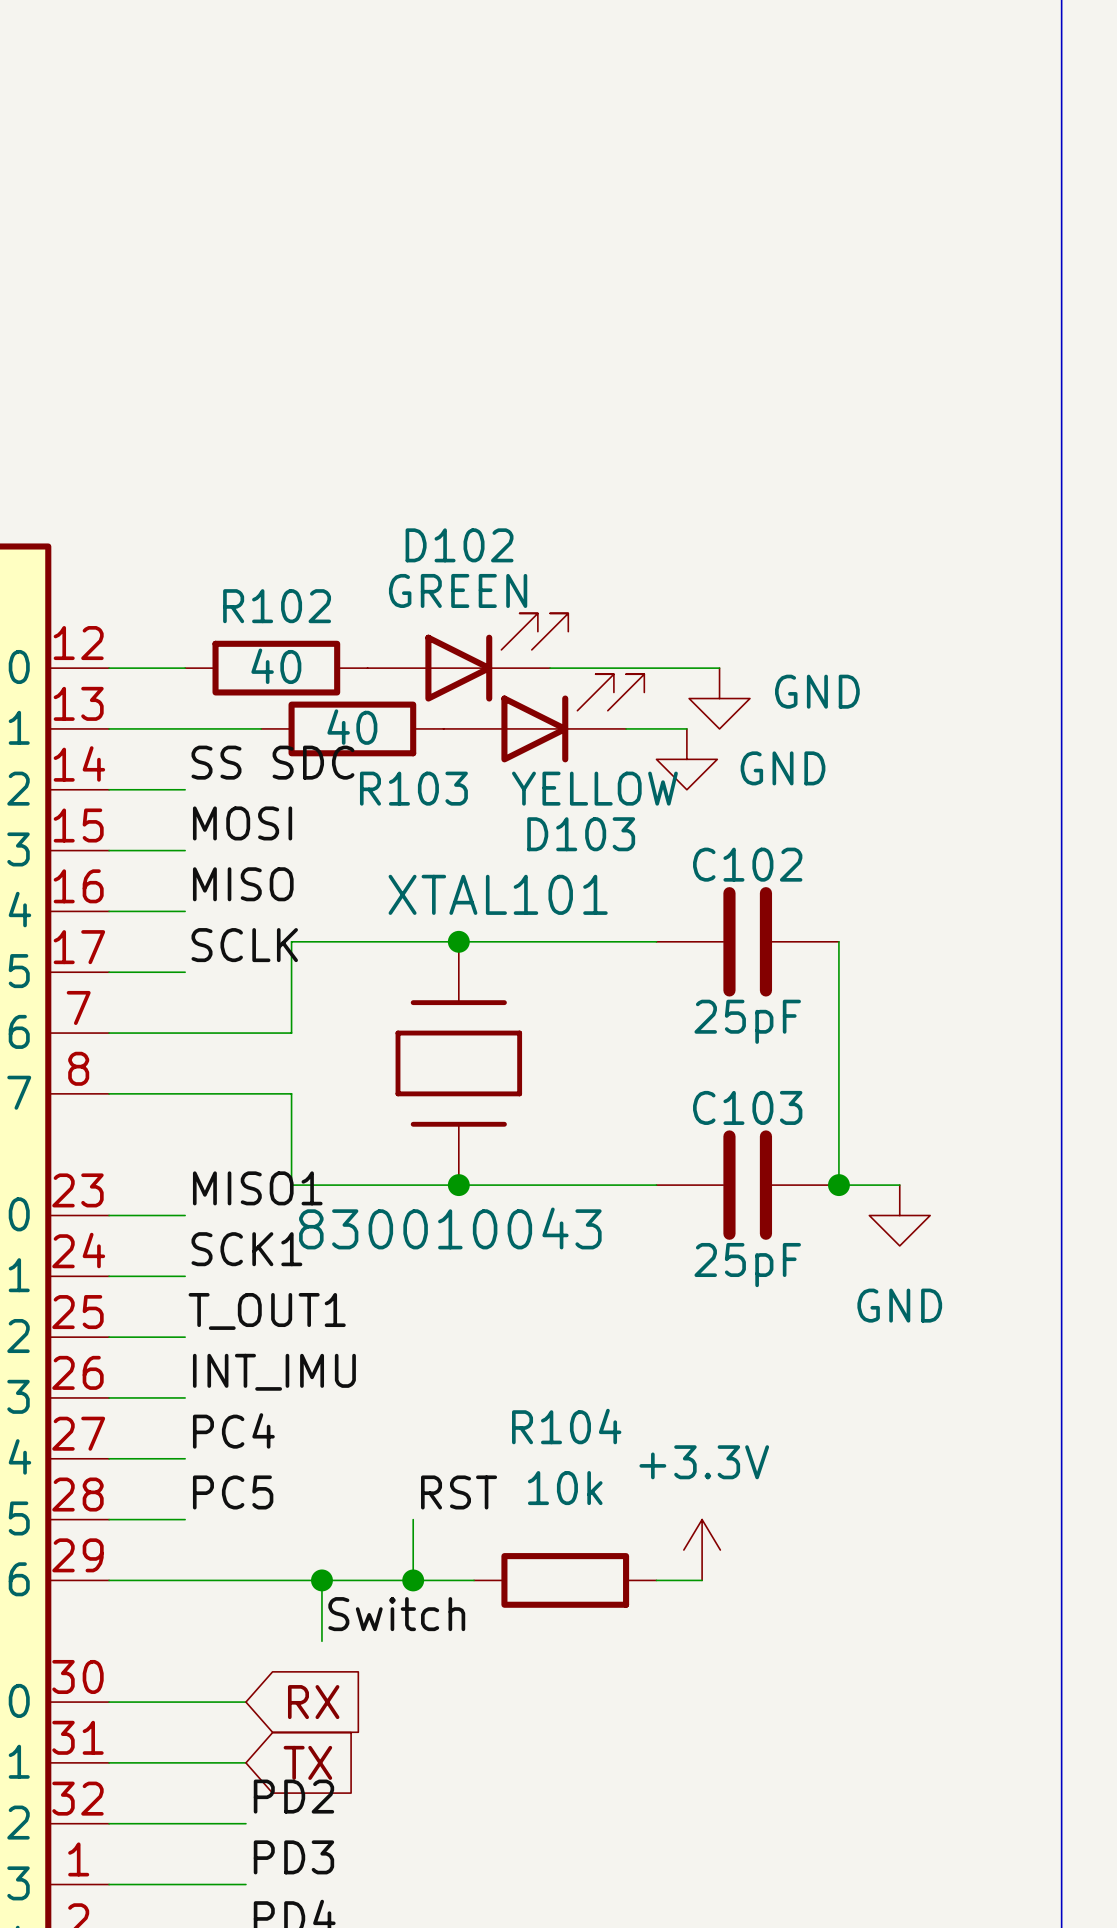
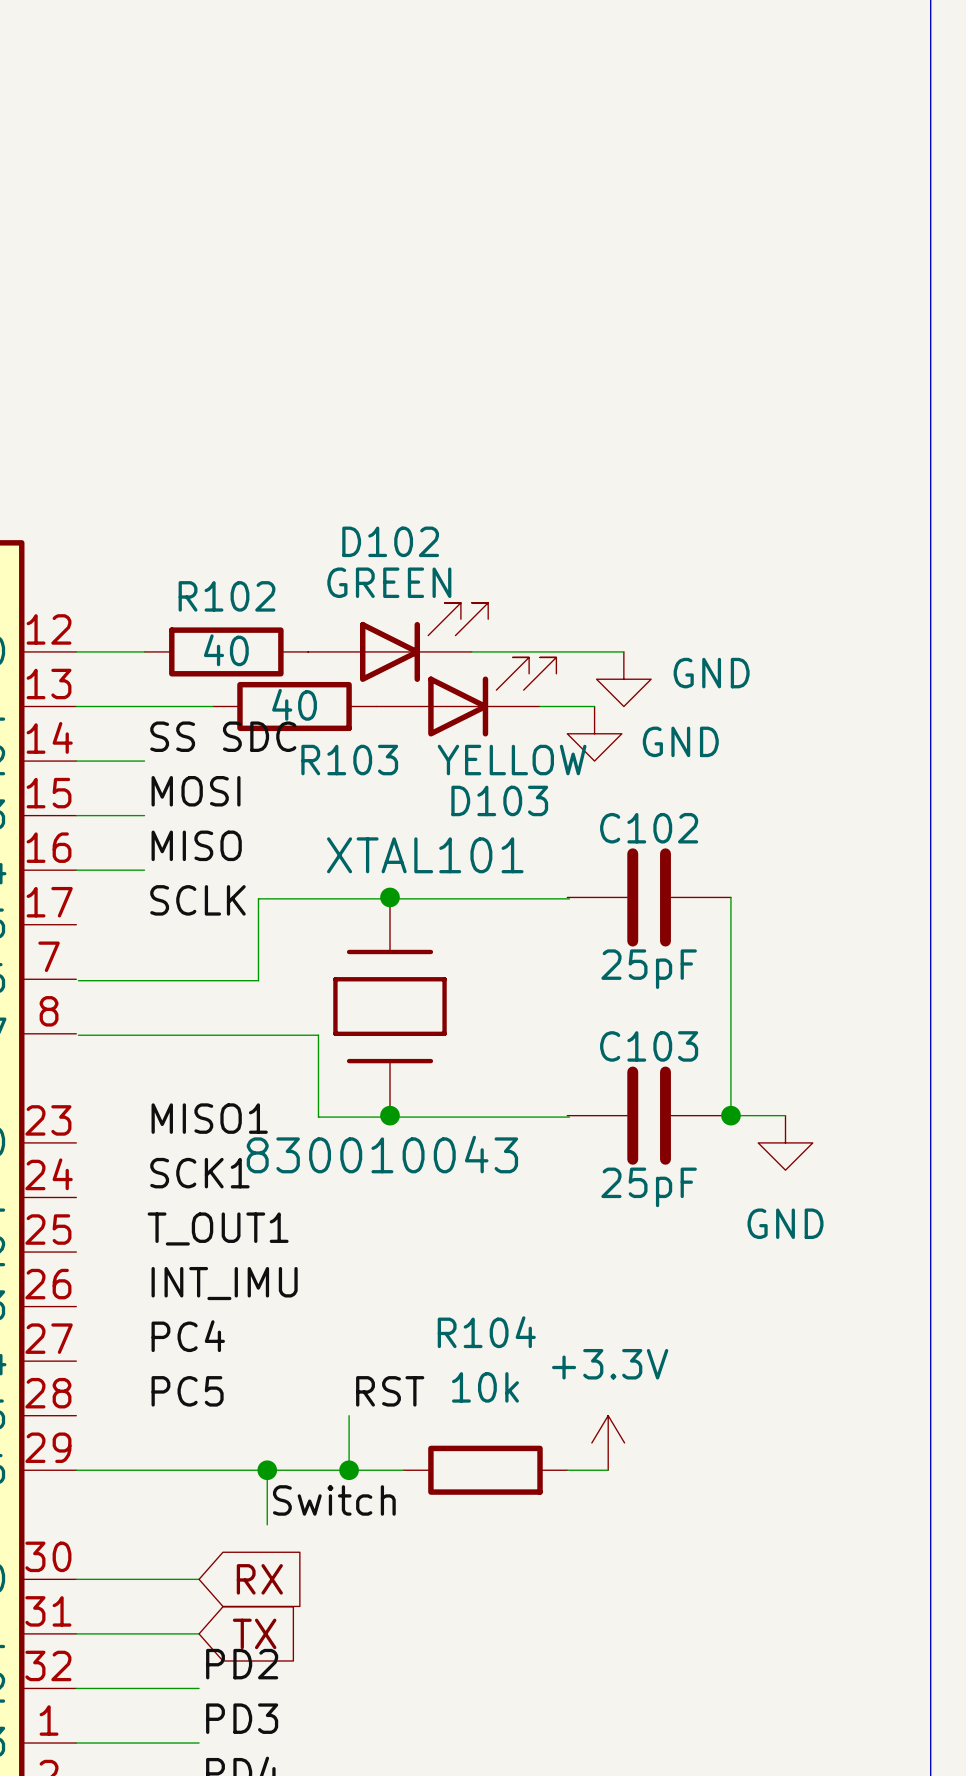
wire: (656, 941) (291, 941) (291, 1033) (109, 1033) -> none
wire: none -> (569, 898) (258, 898) (258, 980) (78, 980)
wire: (109, 972) (185, 972) -> none
wire: (109, 1093) (291, 1093) (291, 1185) (656, 1185) -> none
wire: none -> (78, 1035) (318, 1035) (318, 1117) (569, 1117)
wire: (109, 1215) (185, 1215) -> none
wire: (109, 1276) (185, 1276) -> none
wire: (109, 1337) (185, 1337) -> none
wire: (109, 1397) (185, 1397) -> none
wire: (109, 1458) (185, 1458) -> none
wire: (109, 1519) (185, 1519) -> none

